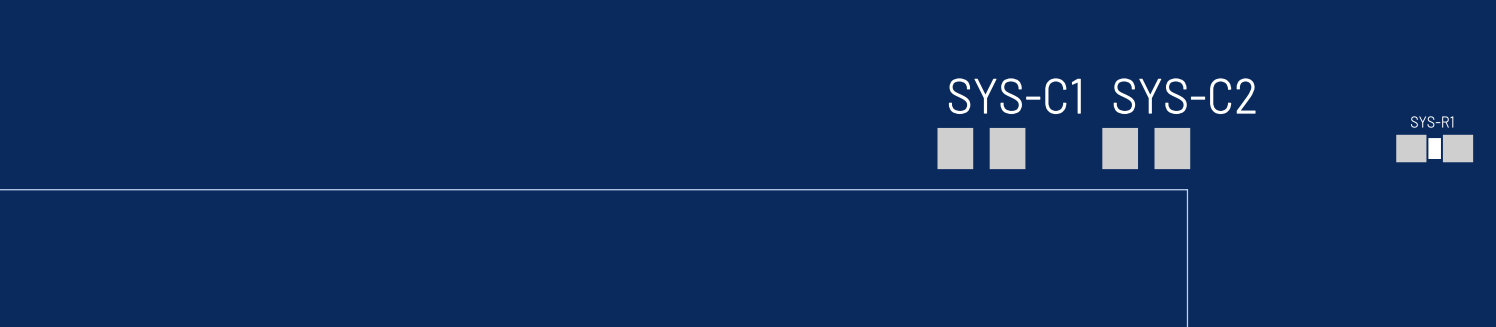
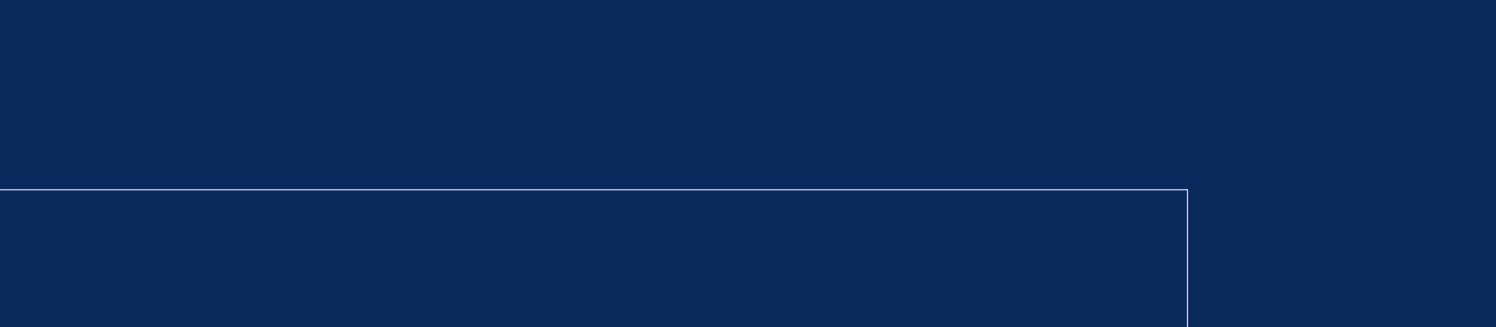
SYS-C1: (981, 148) -> none
SYS-C2: (1146, 148) -> none
SYS-R1: (1434, 148) -> none

